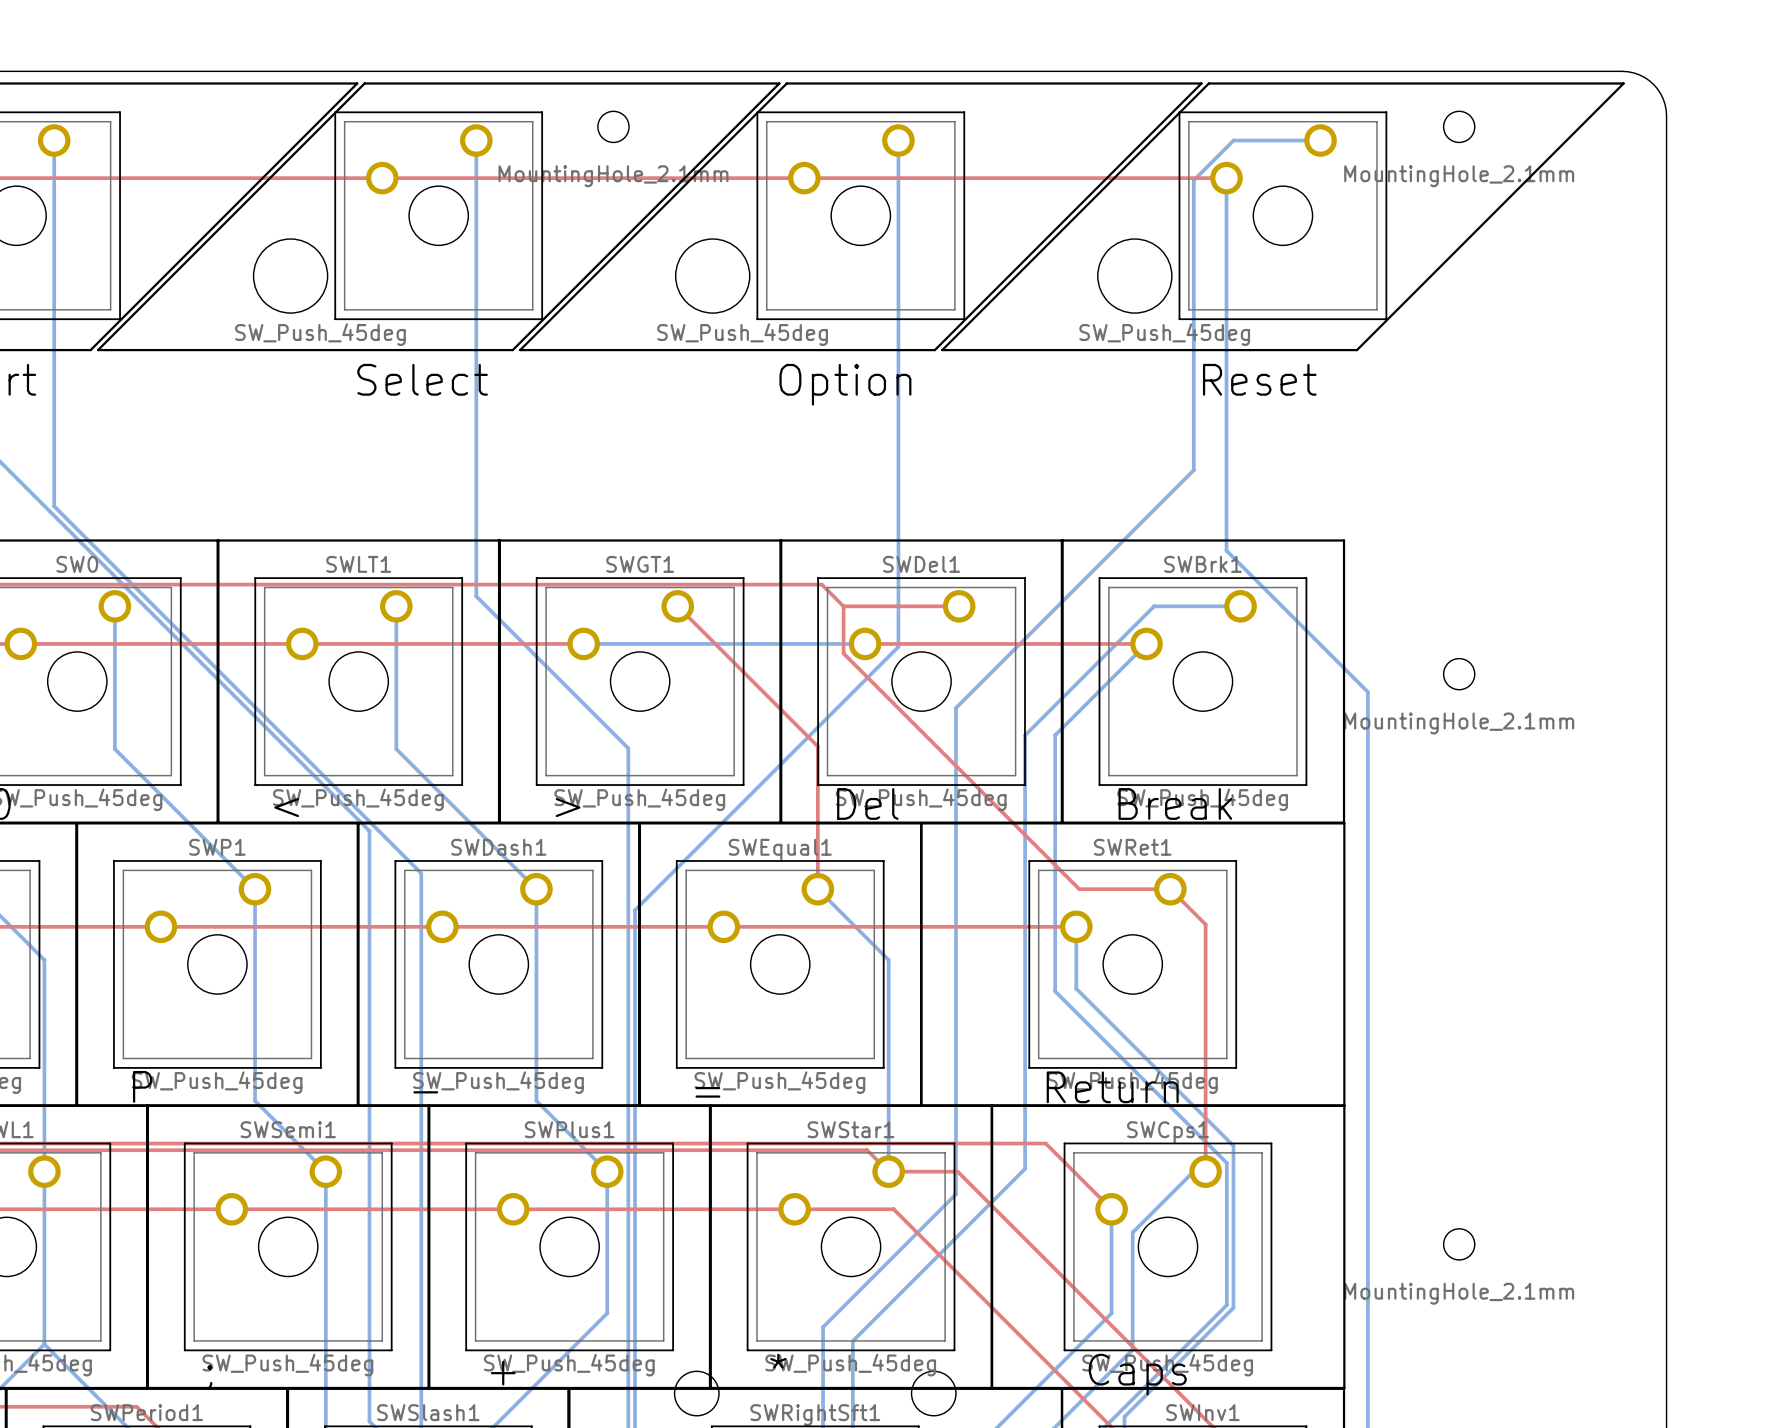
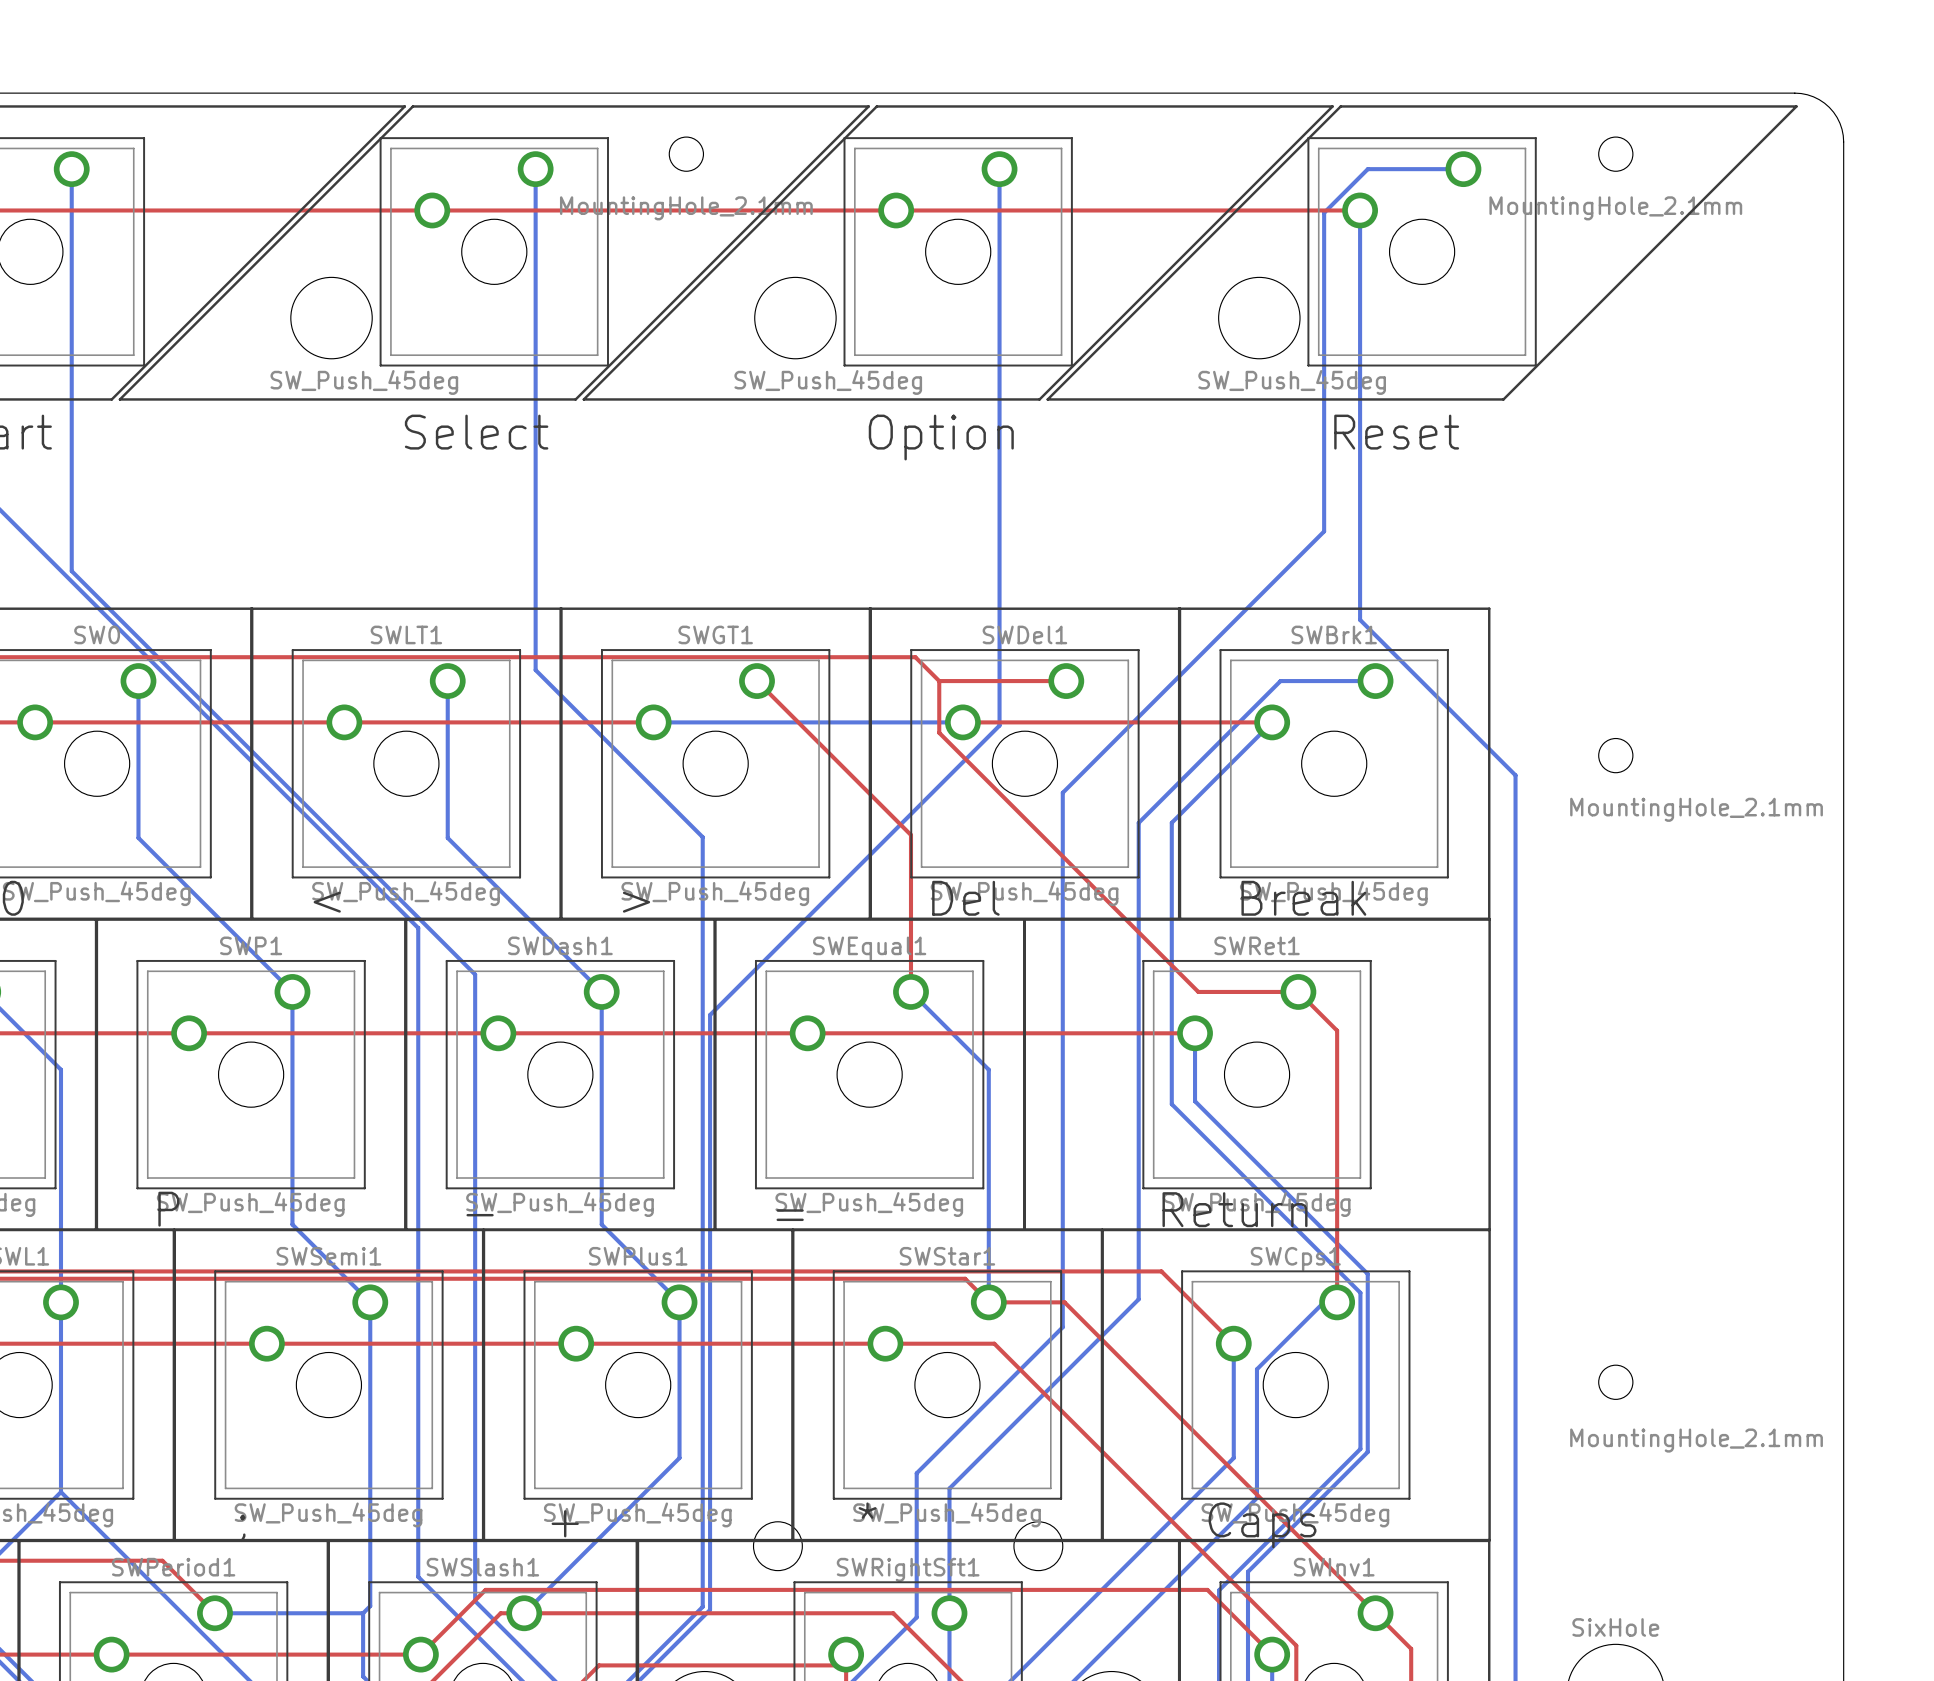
part value position: MountingHole_2.1mm (1459, 723) -> MountingHole_2.1mm (1696, 809)
part value position: MountingHole_2.1mm (1459, 1293) -> MountingHole_2.1mm (1696, 1440)

